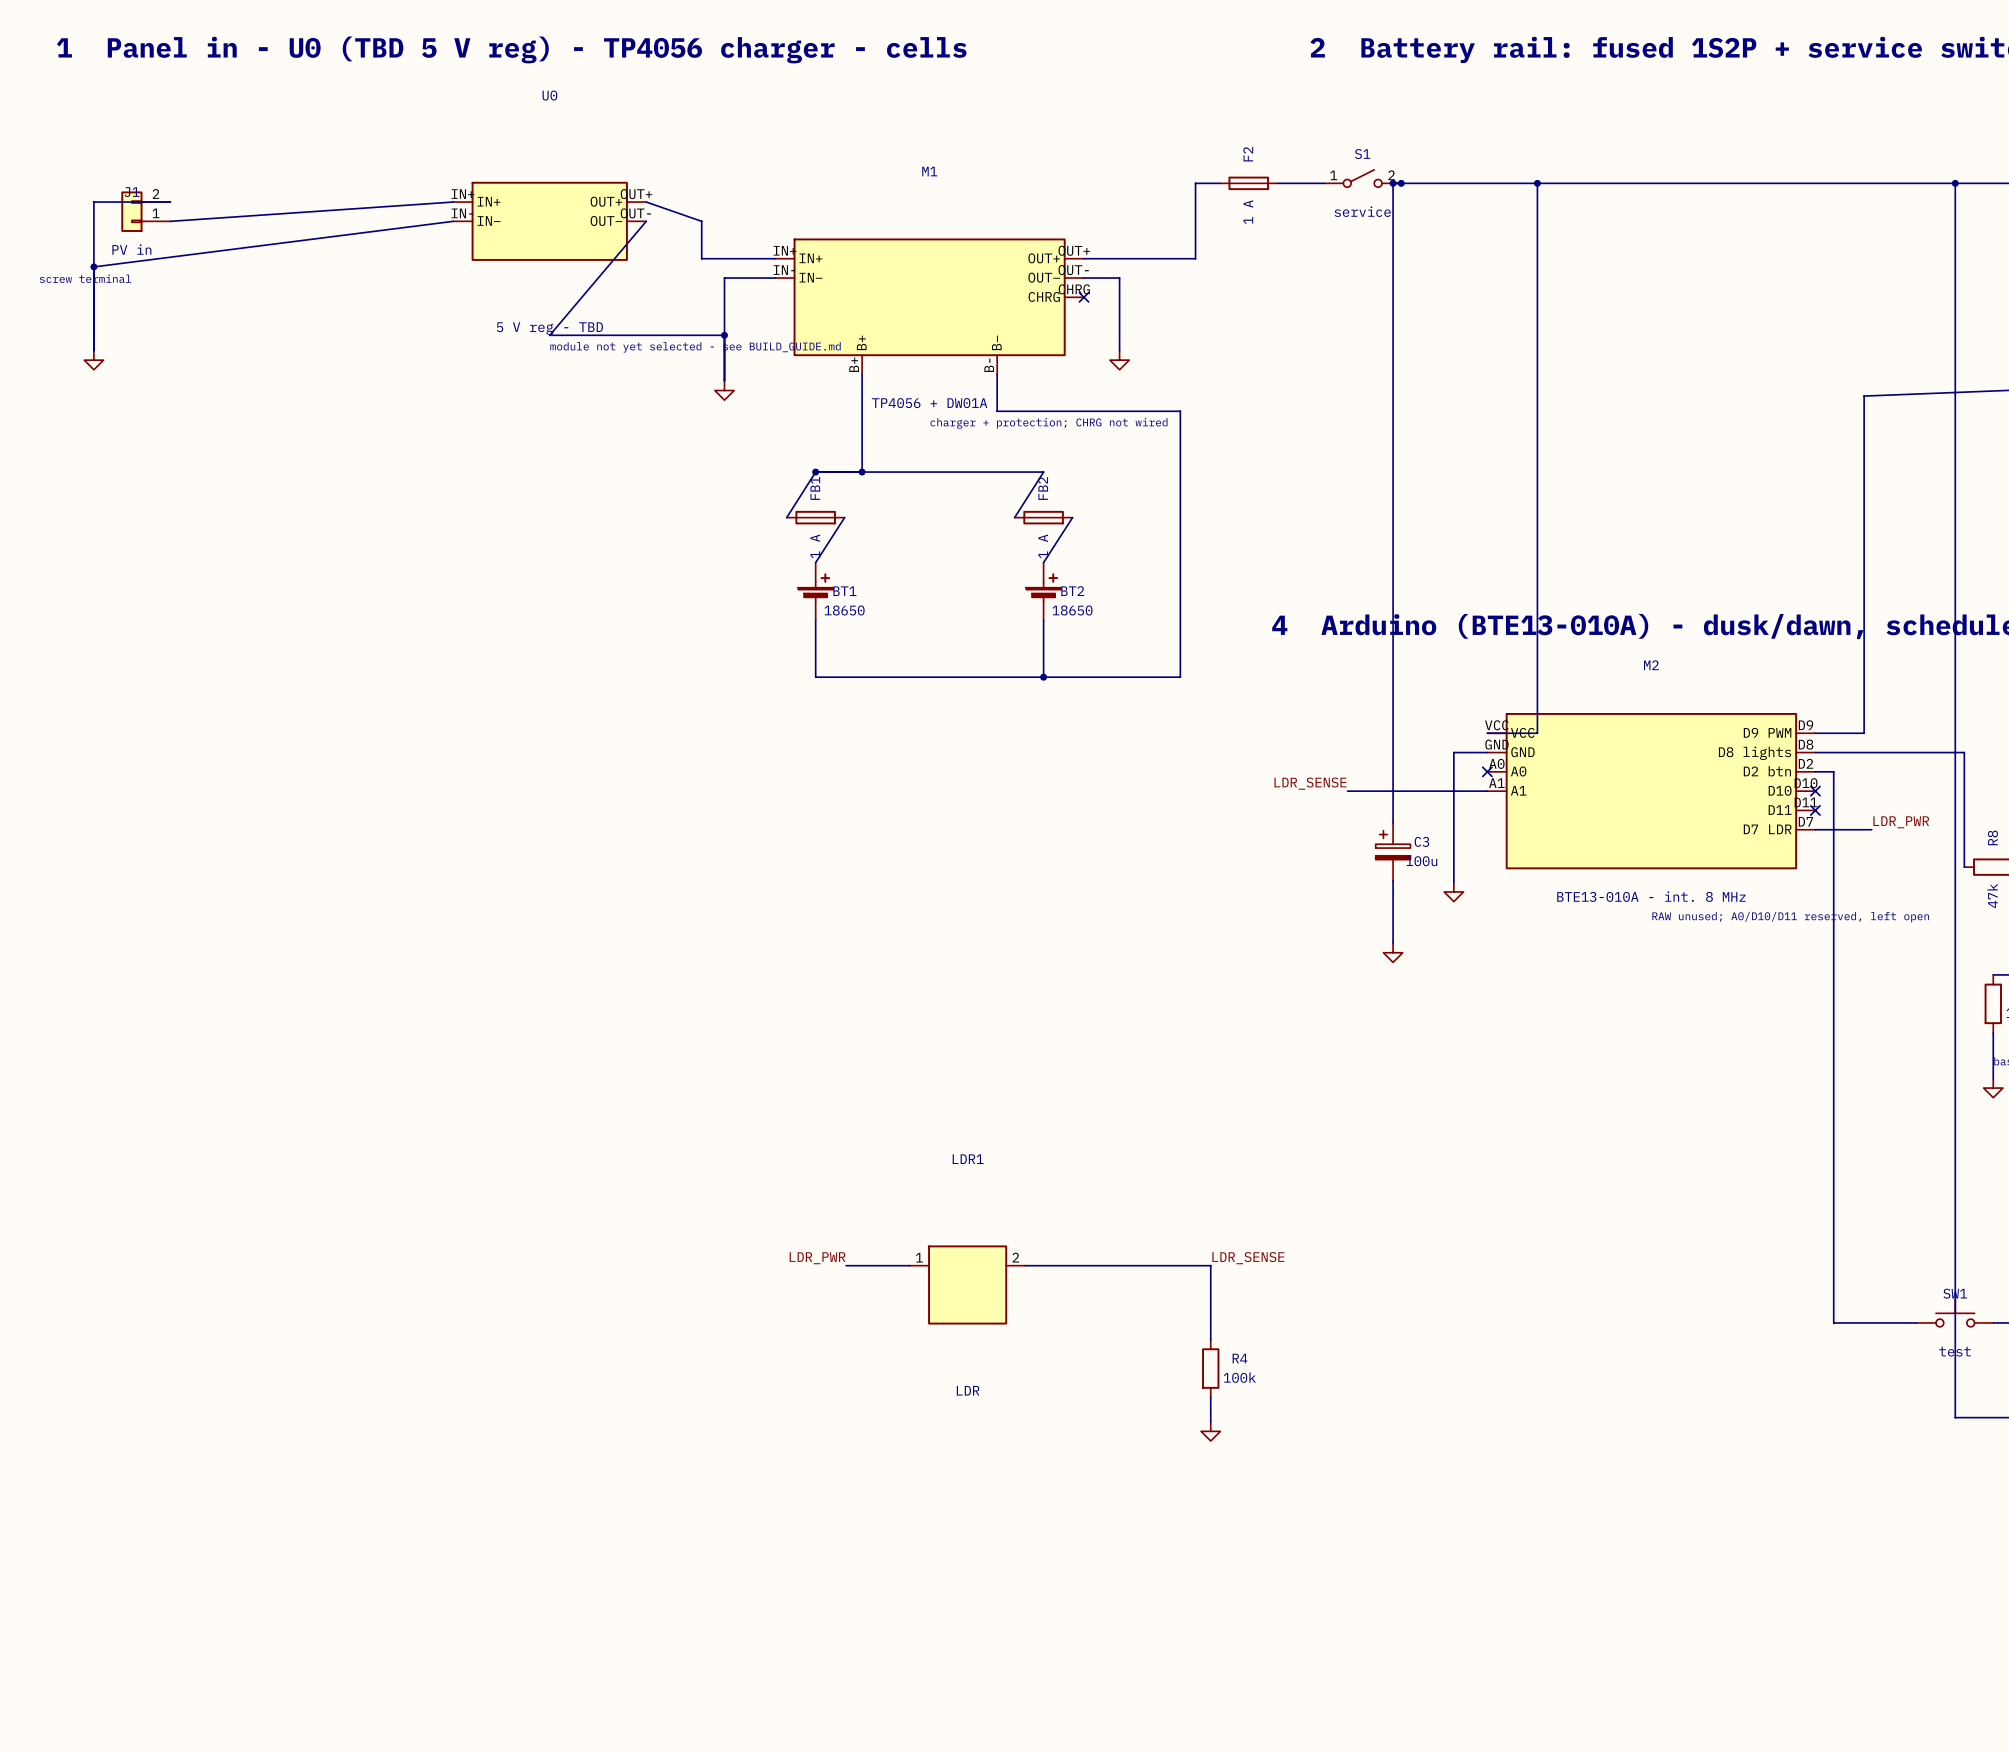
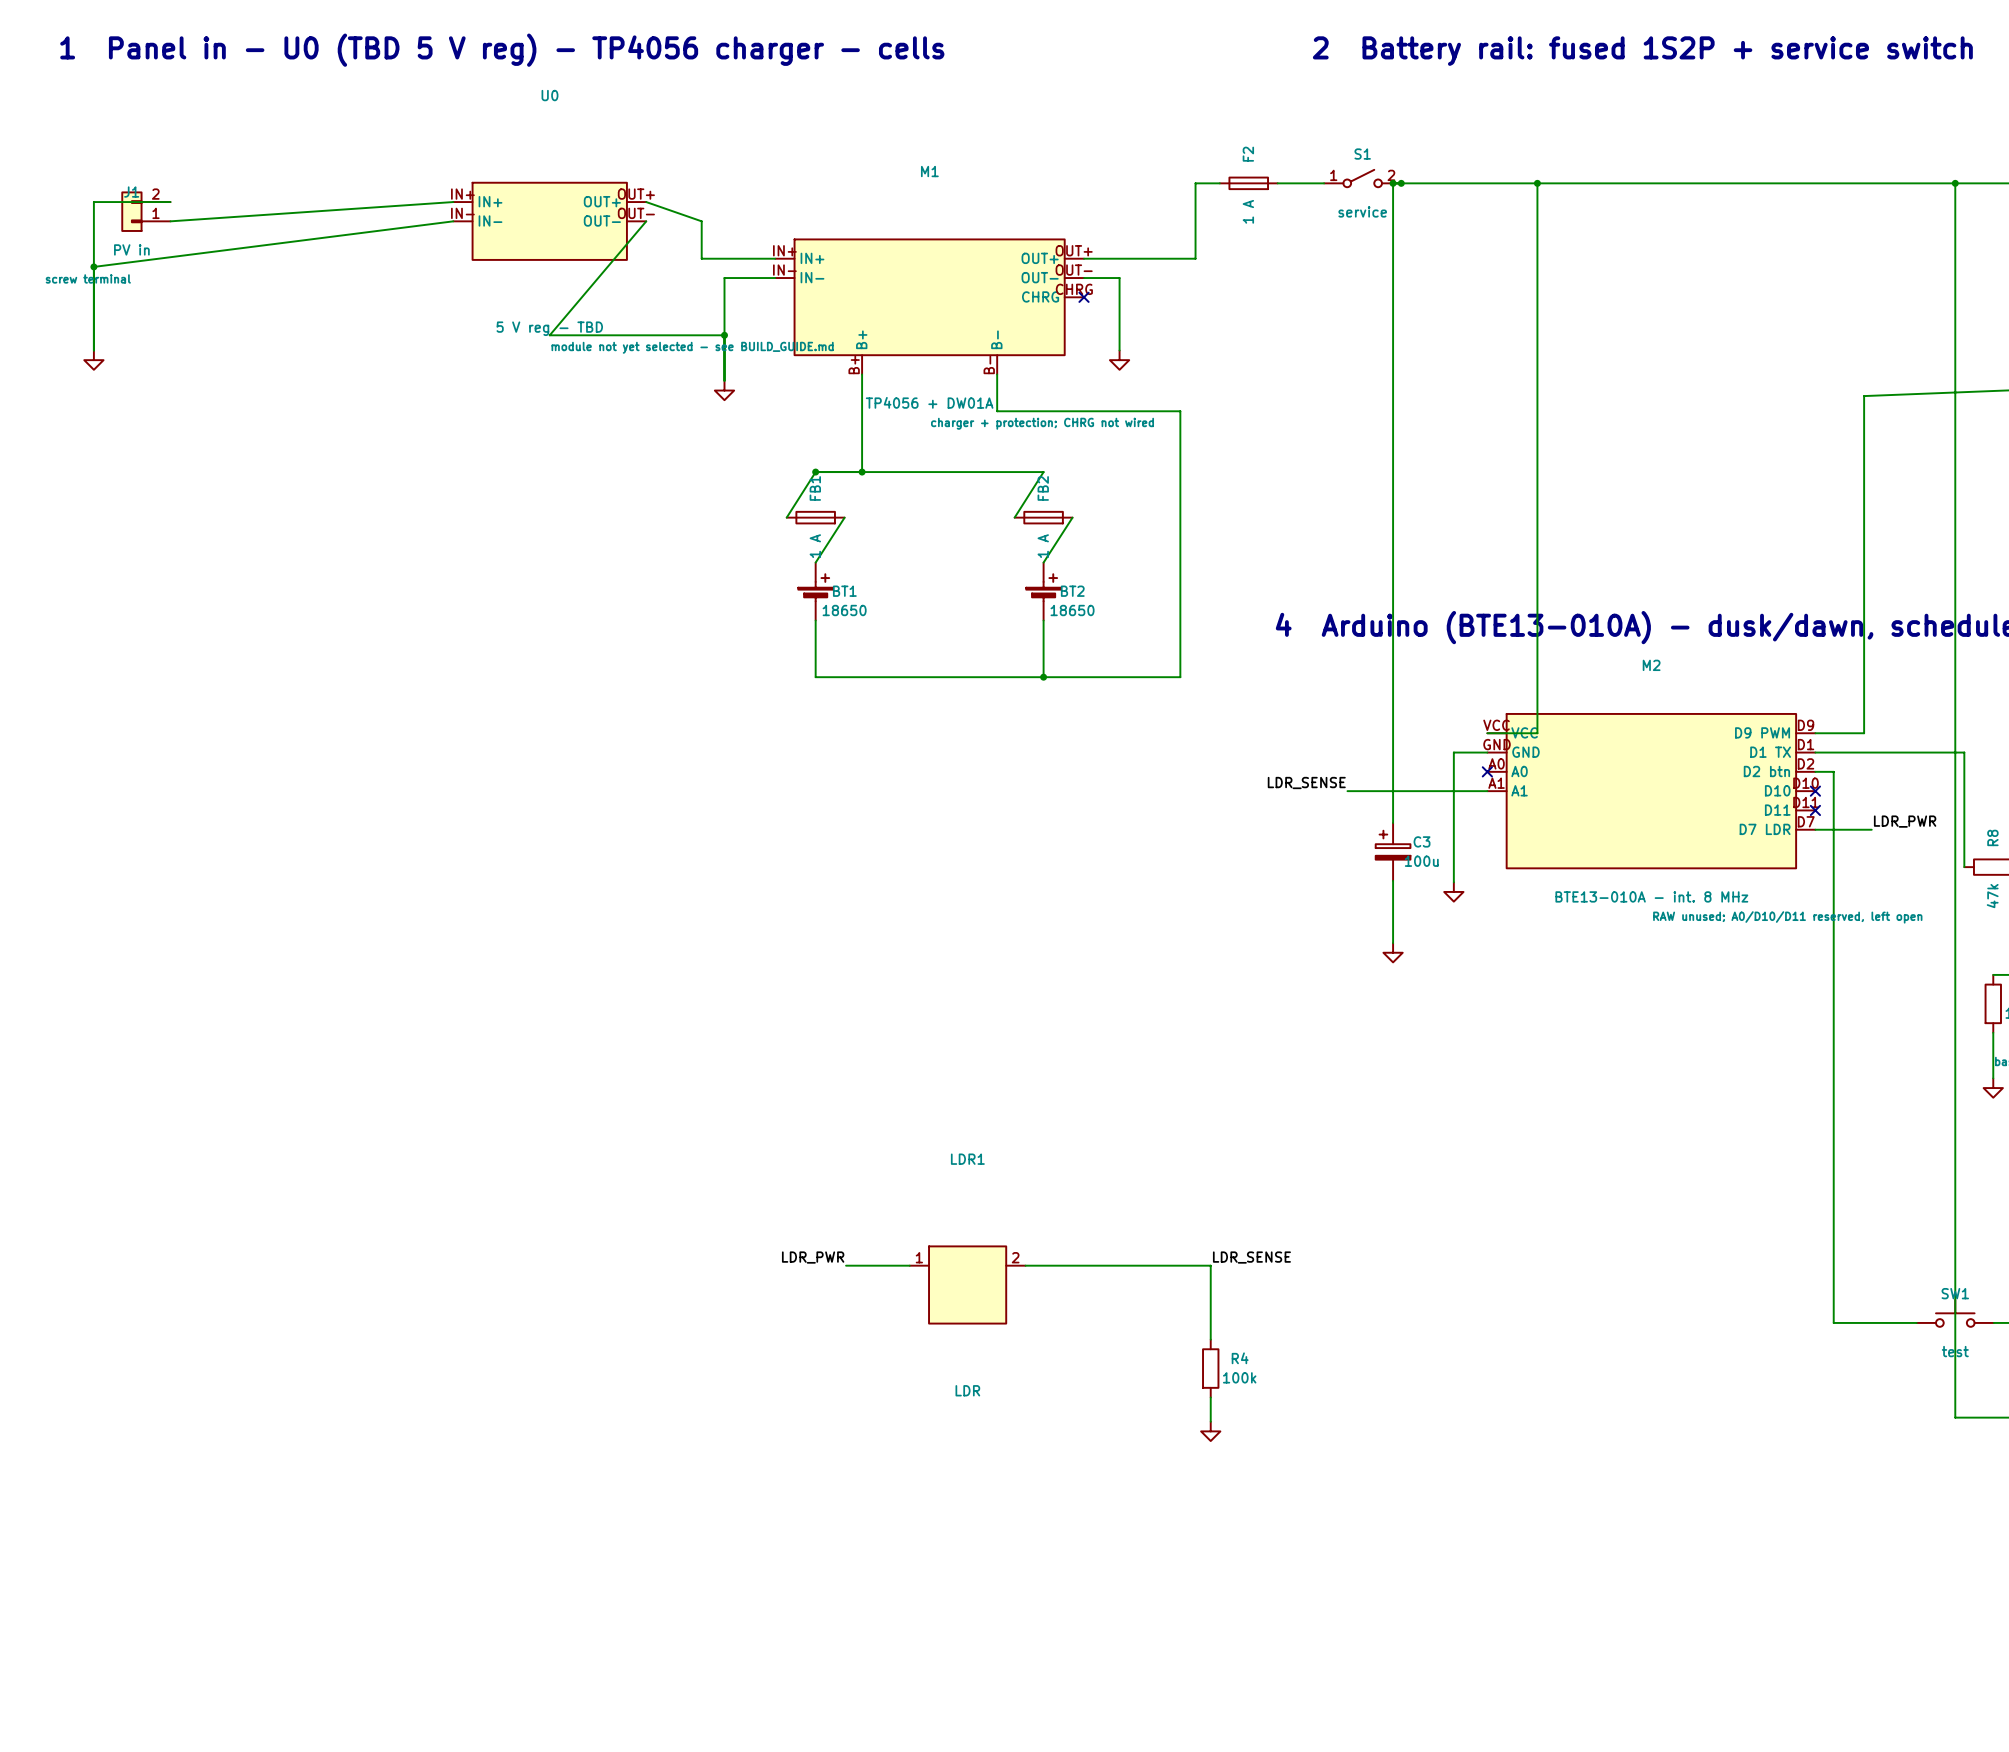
M2 pin number: D8 (1806, 744) -> D1 (1806, 744)
M2 pin name: D8 lights (1755, 753) -> D1 TX (1770, 752)

